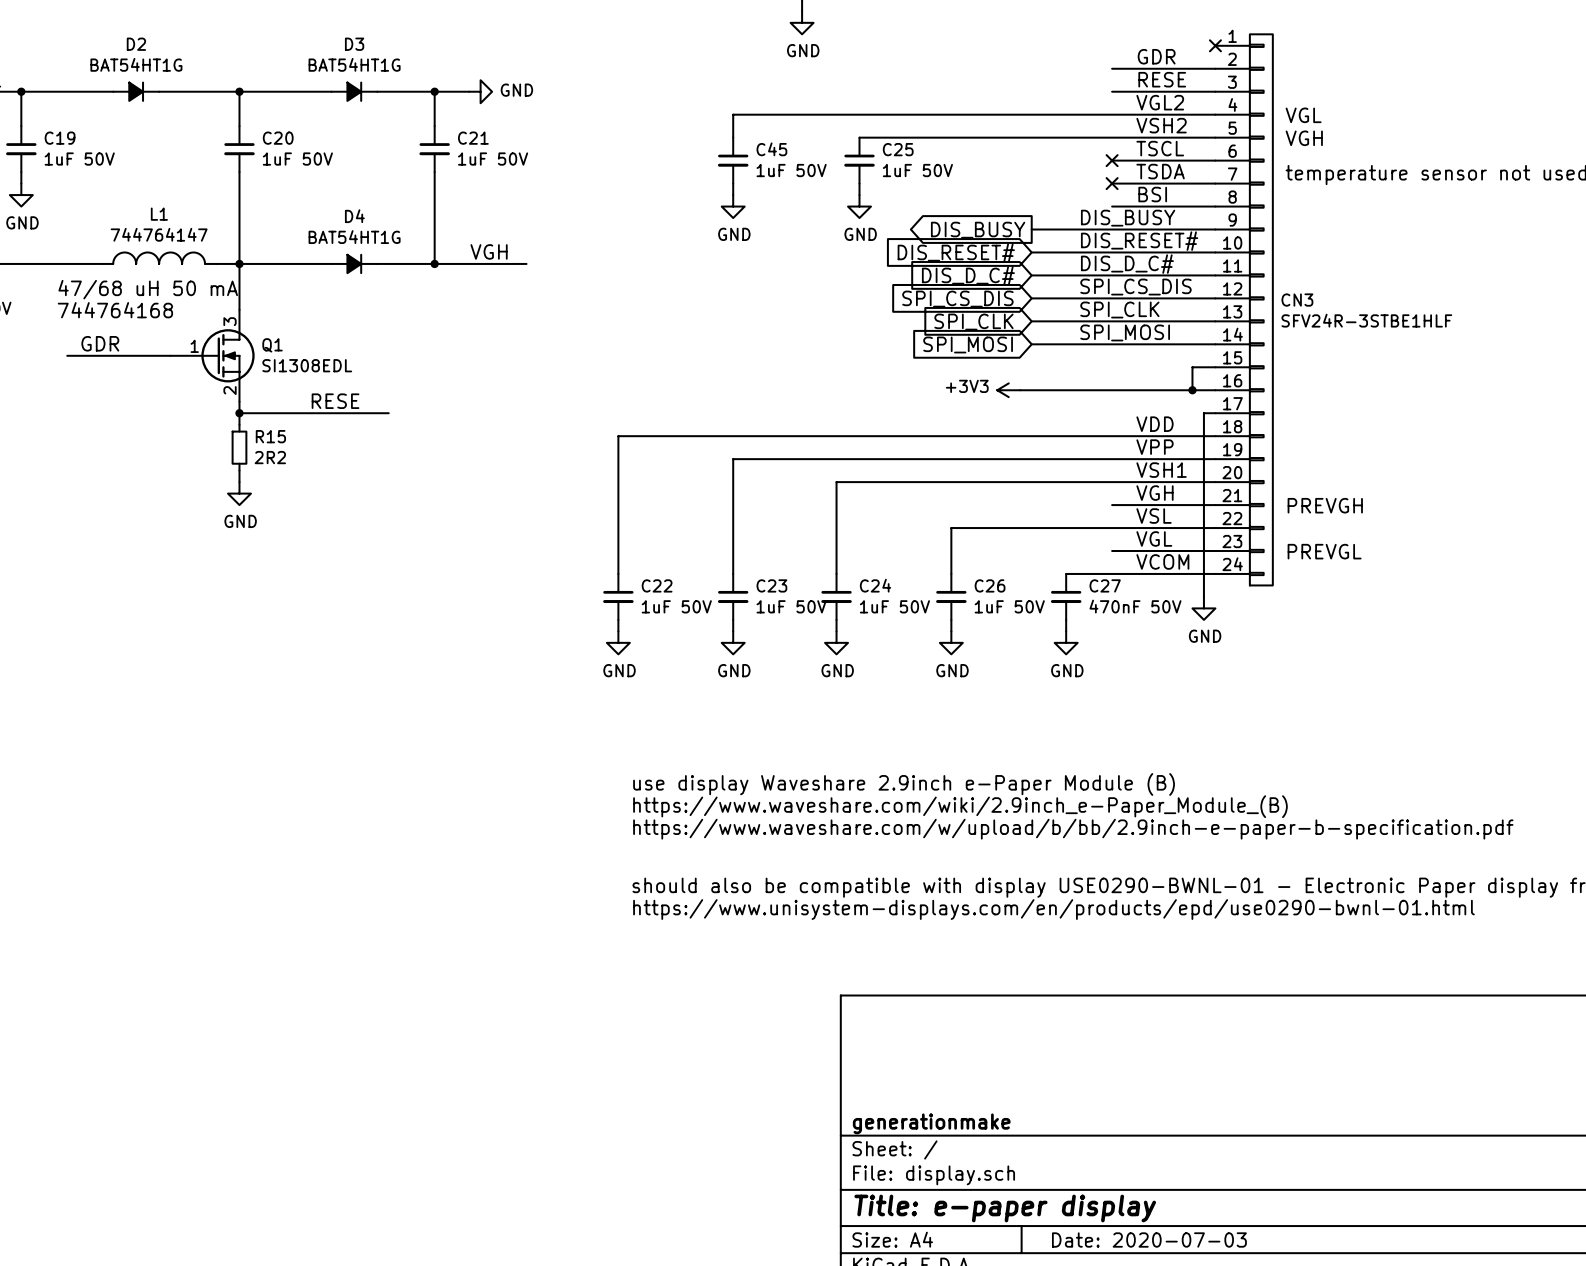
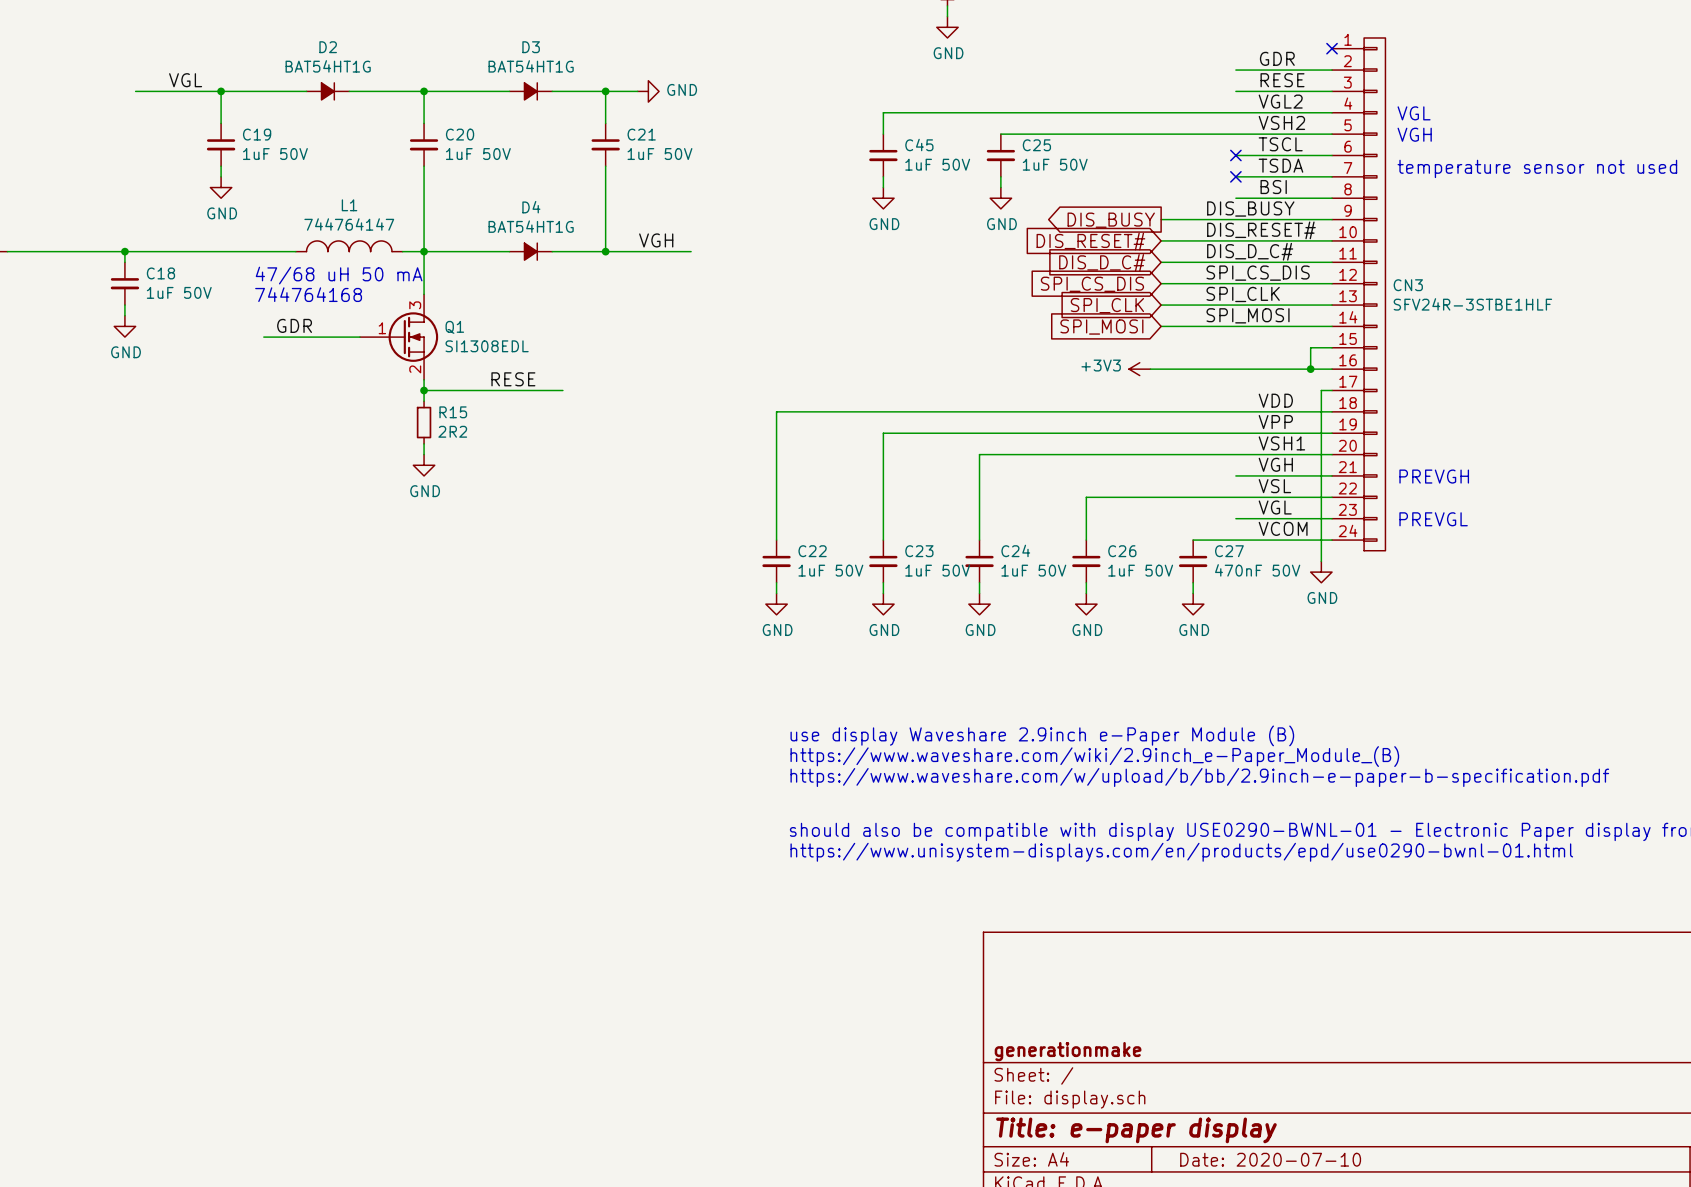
title block: Date: 2020-07-03 (1149, 1240) -> Date: 2020-07-10 (1270, 1159)

